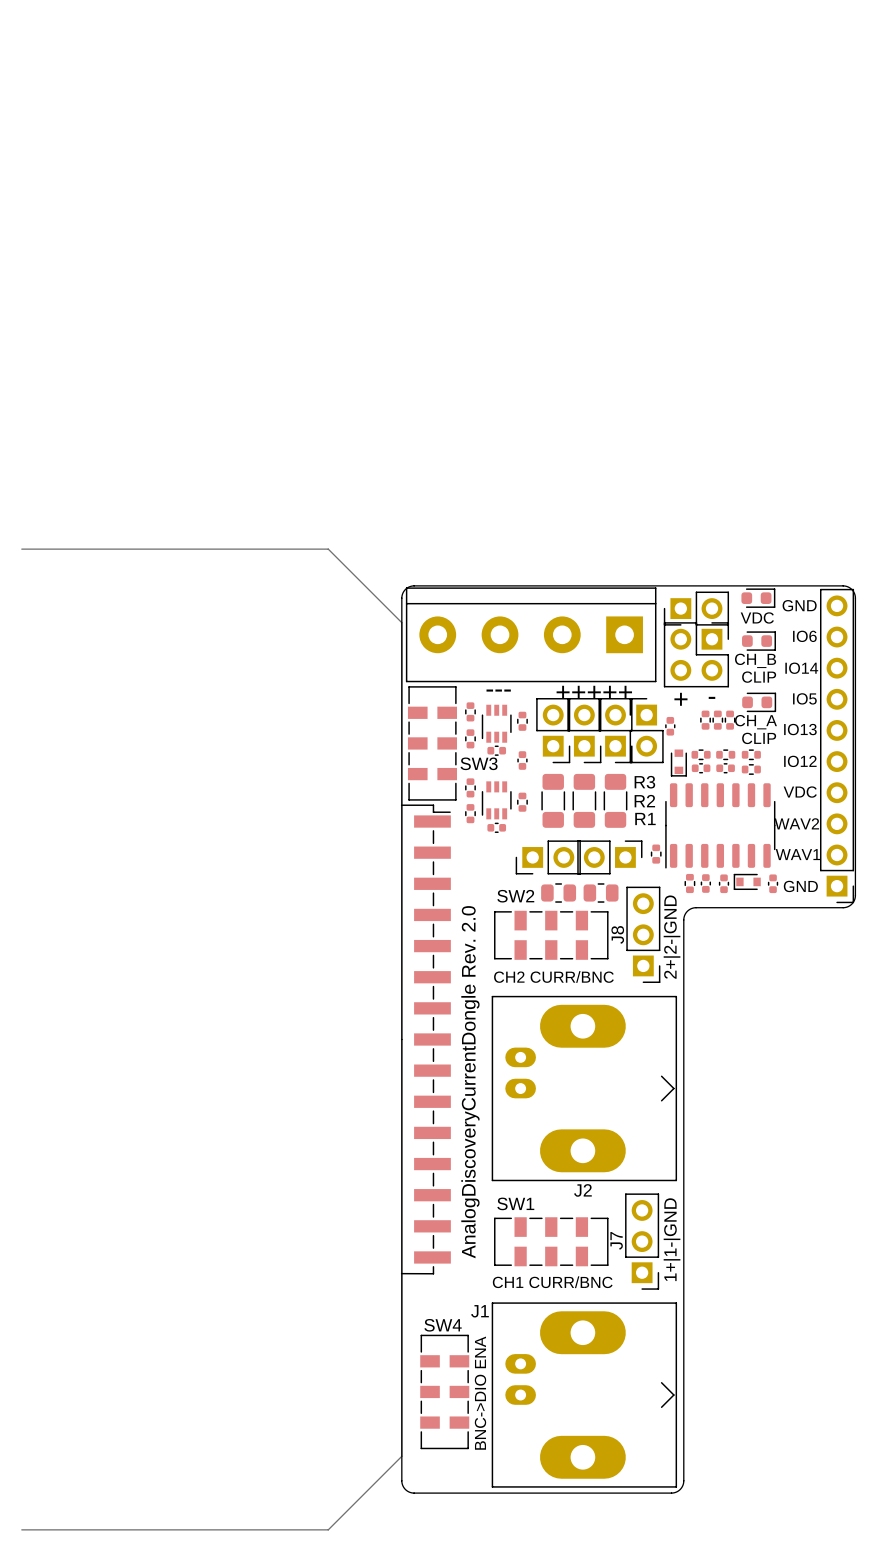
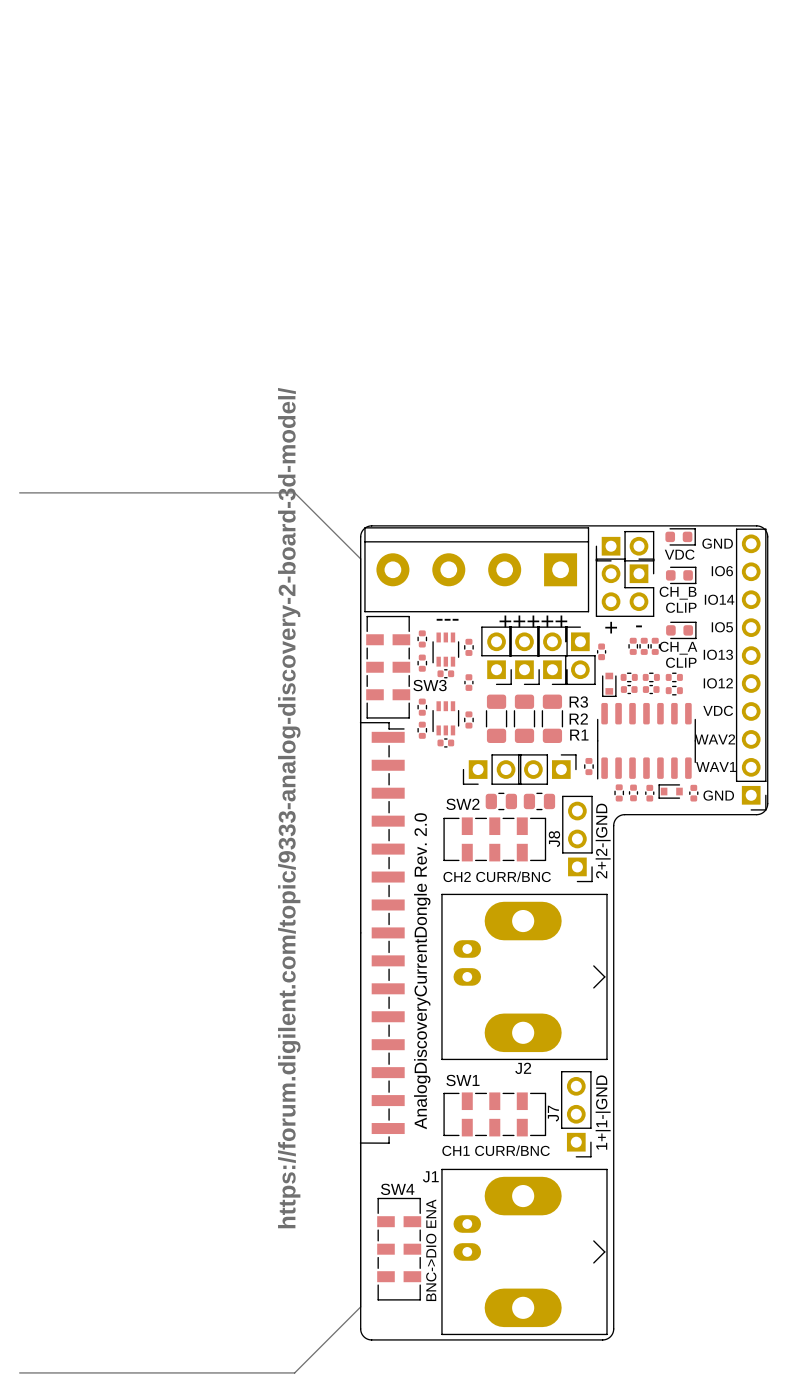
text: none -> https://forum.digilent.com/topic/9333-analog-discovery-2-board-3d-model/ (289, 808)

